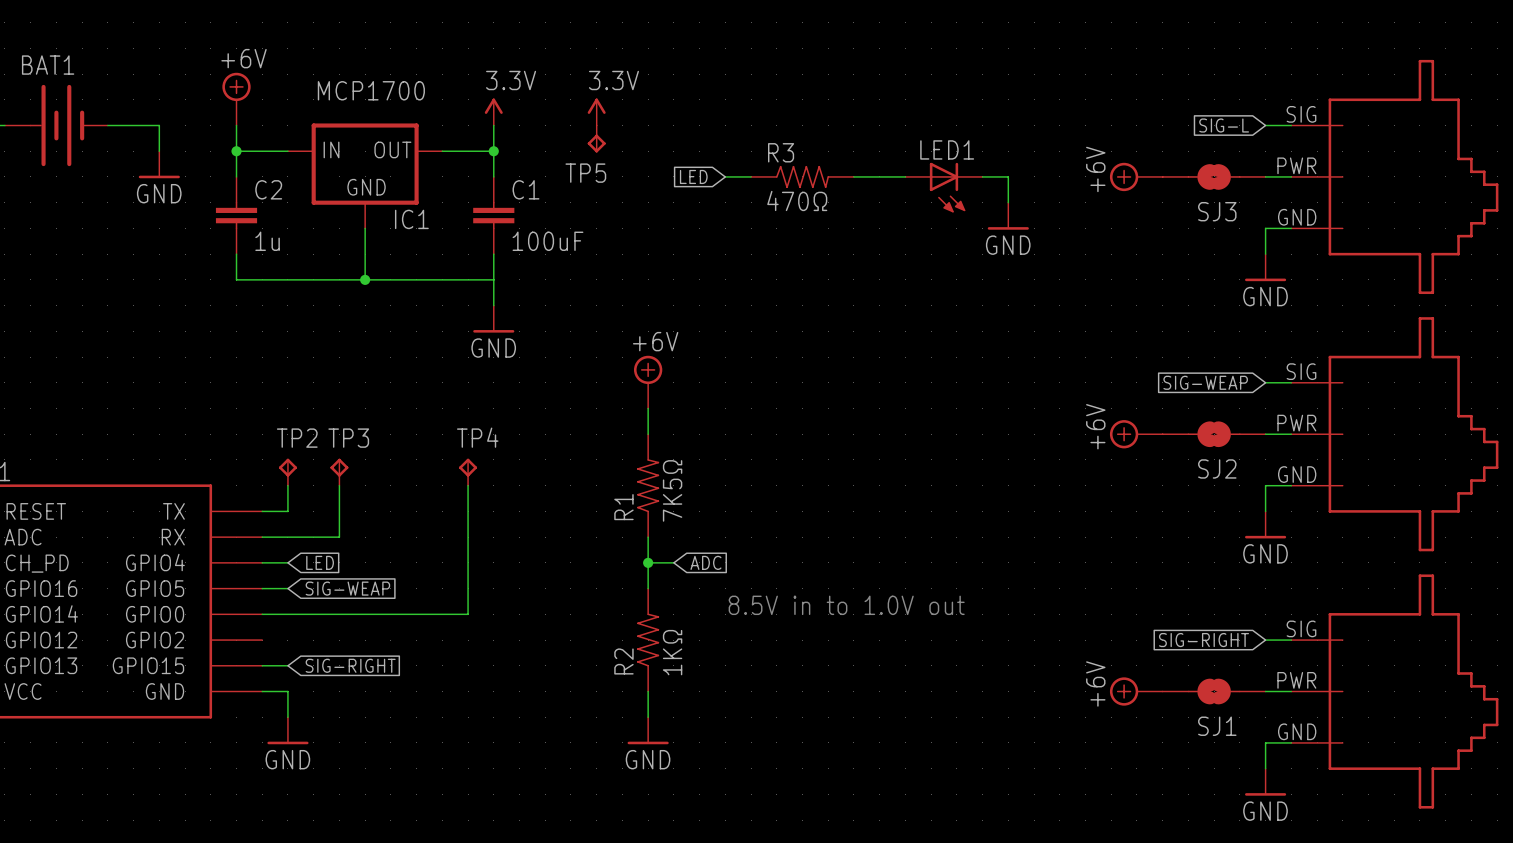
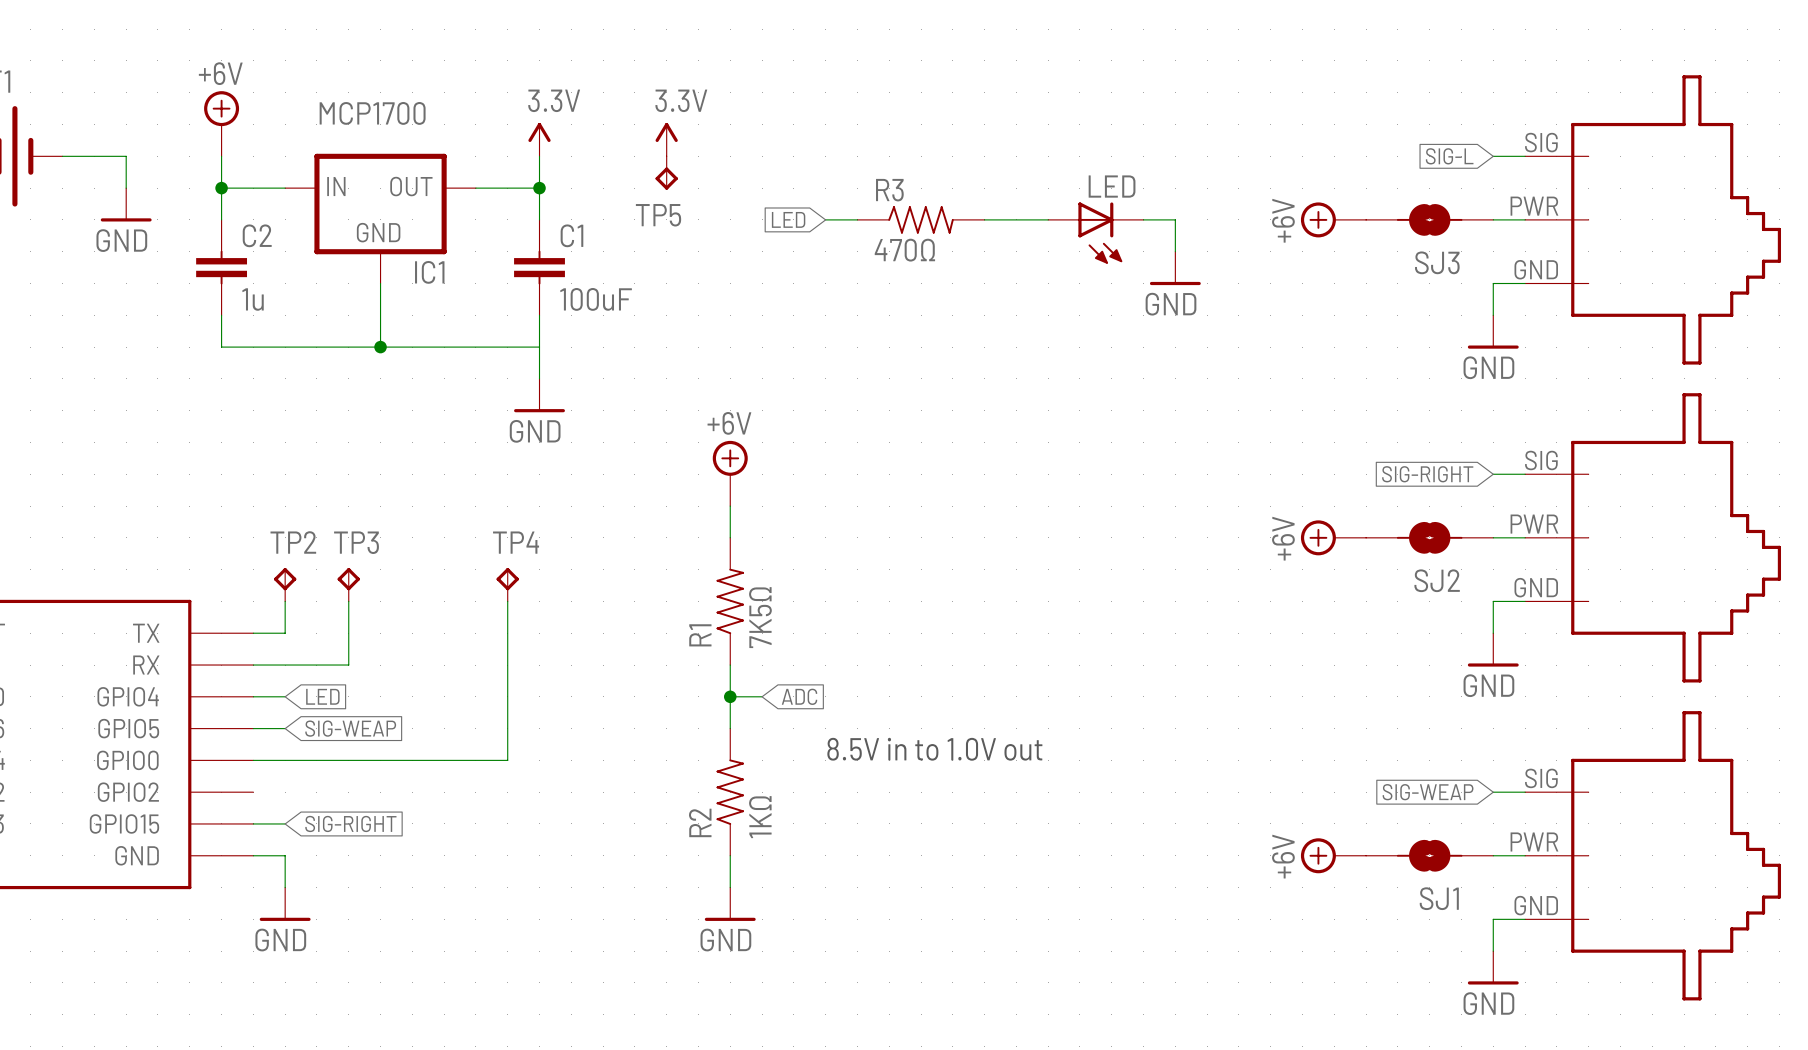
LED1 name: LED1 (947, 149) -> LED (1112, 186)
global label: SIG-WEAP (1205, 382) -> SIG-RIGHT (1427, 474)
global label: SIG-RIGHT (1203, 640) -> SIG-WEAP (1428, 792)

